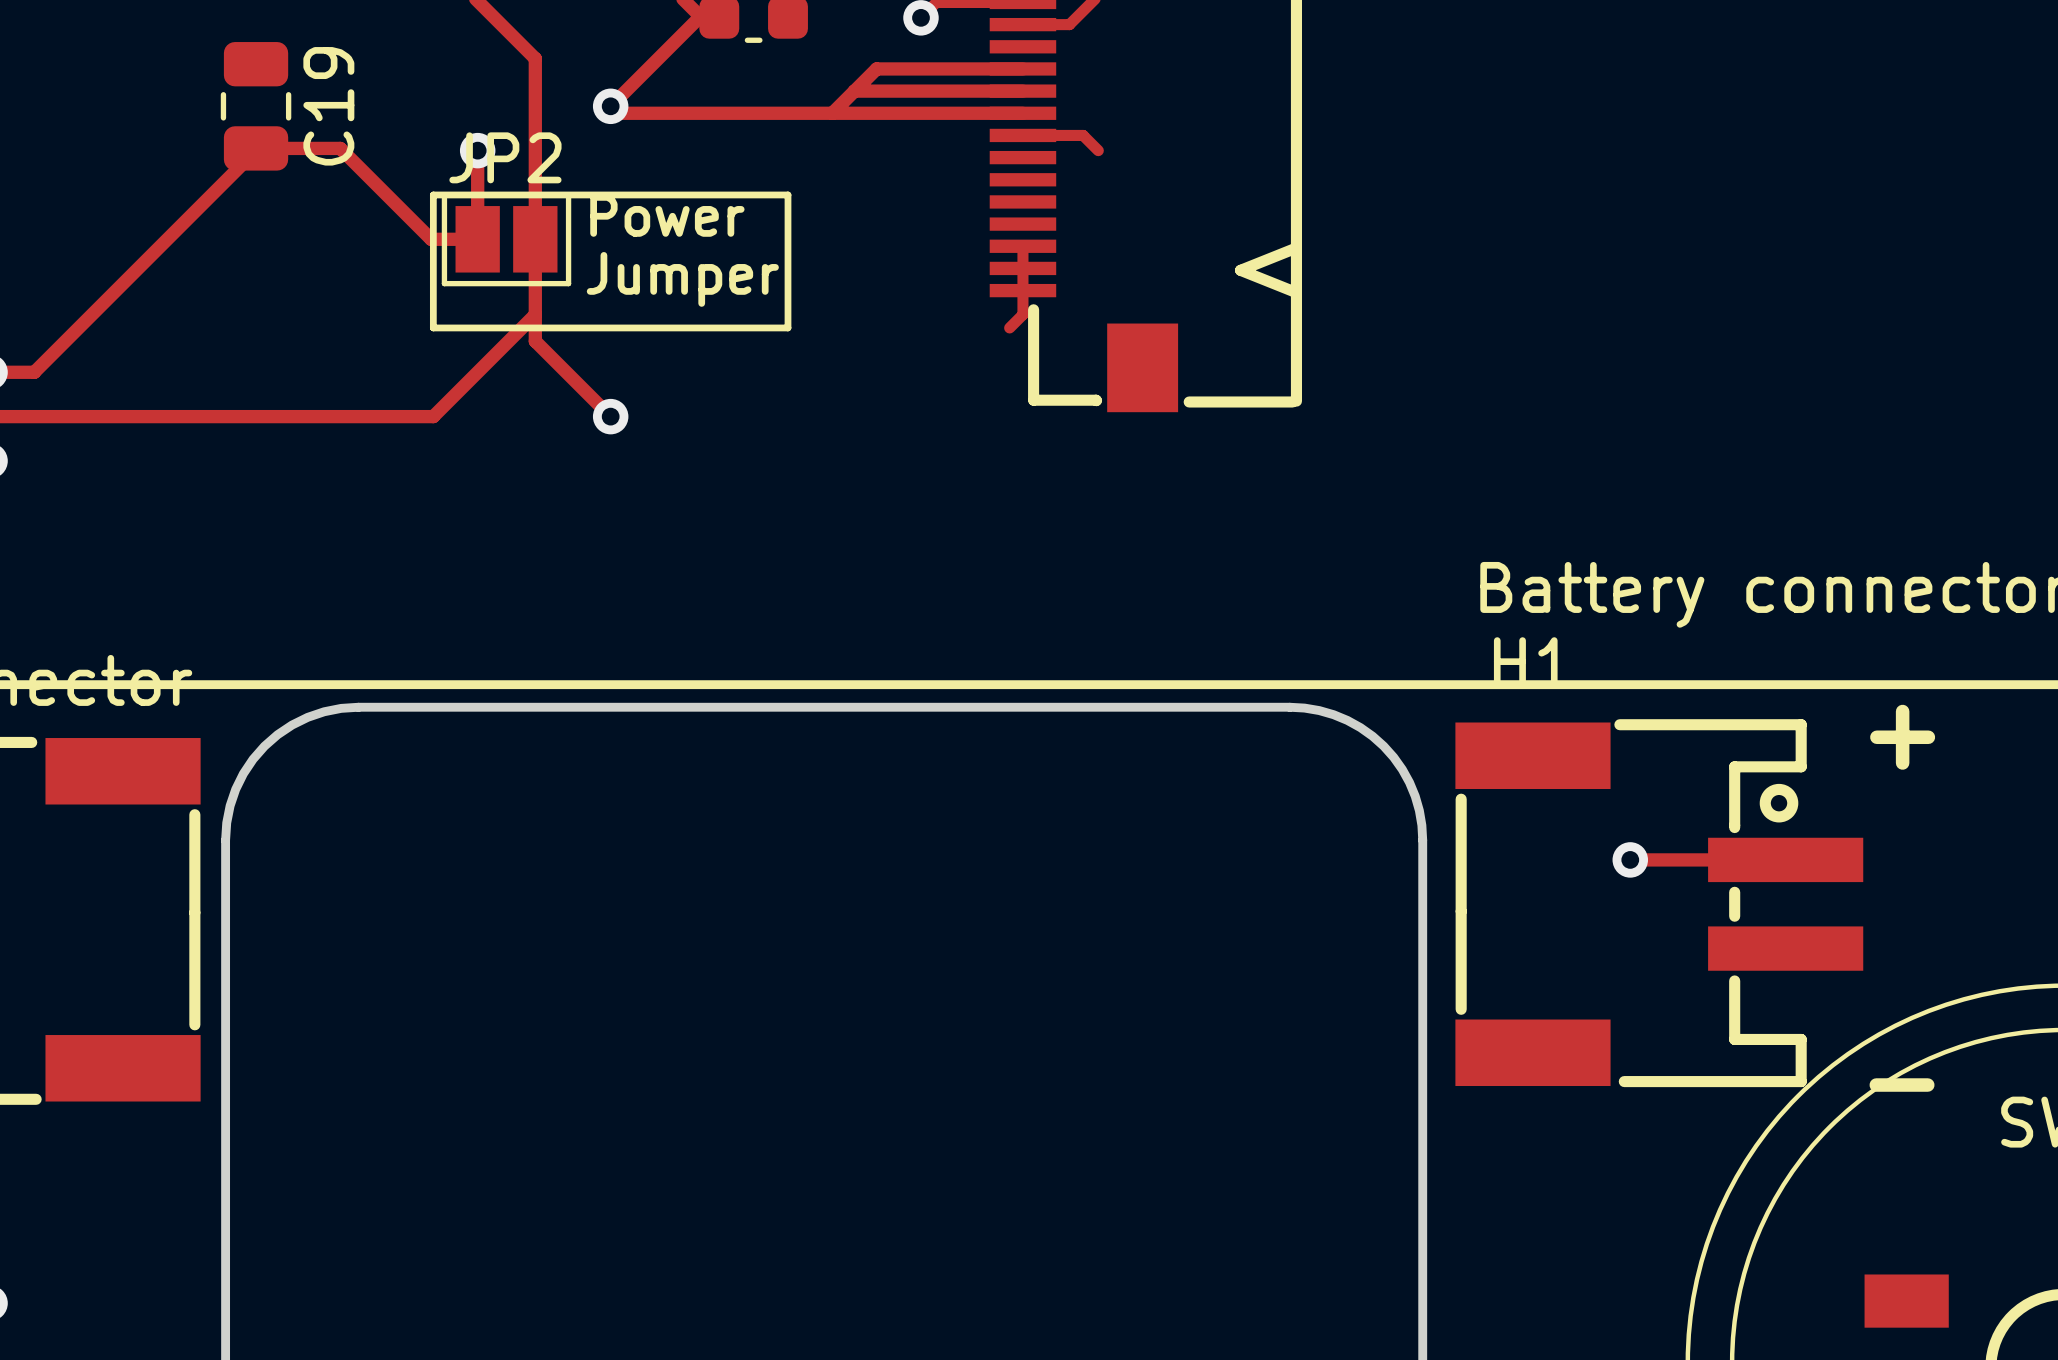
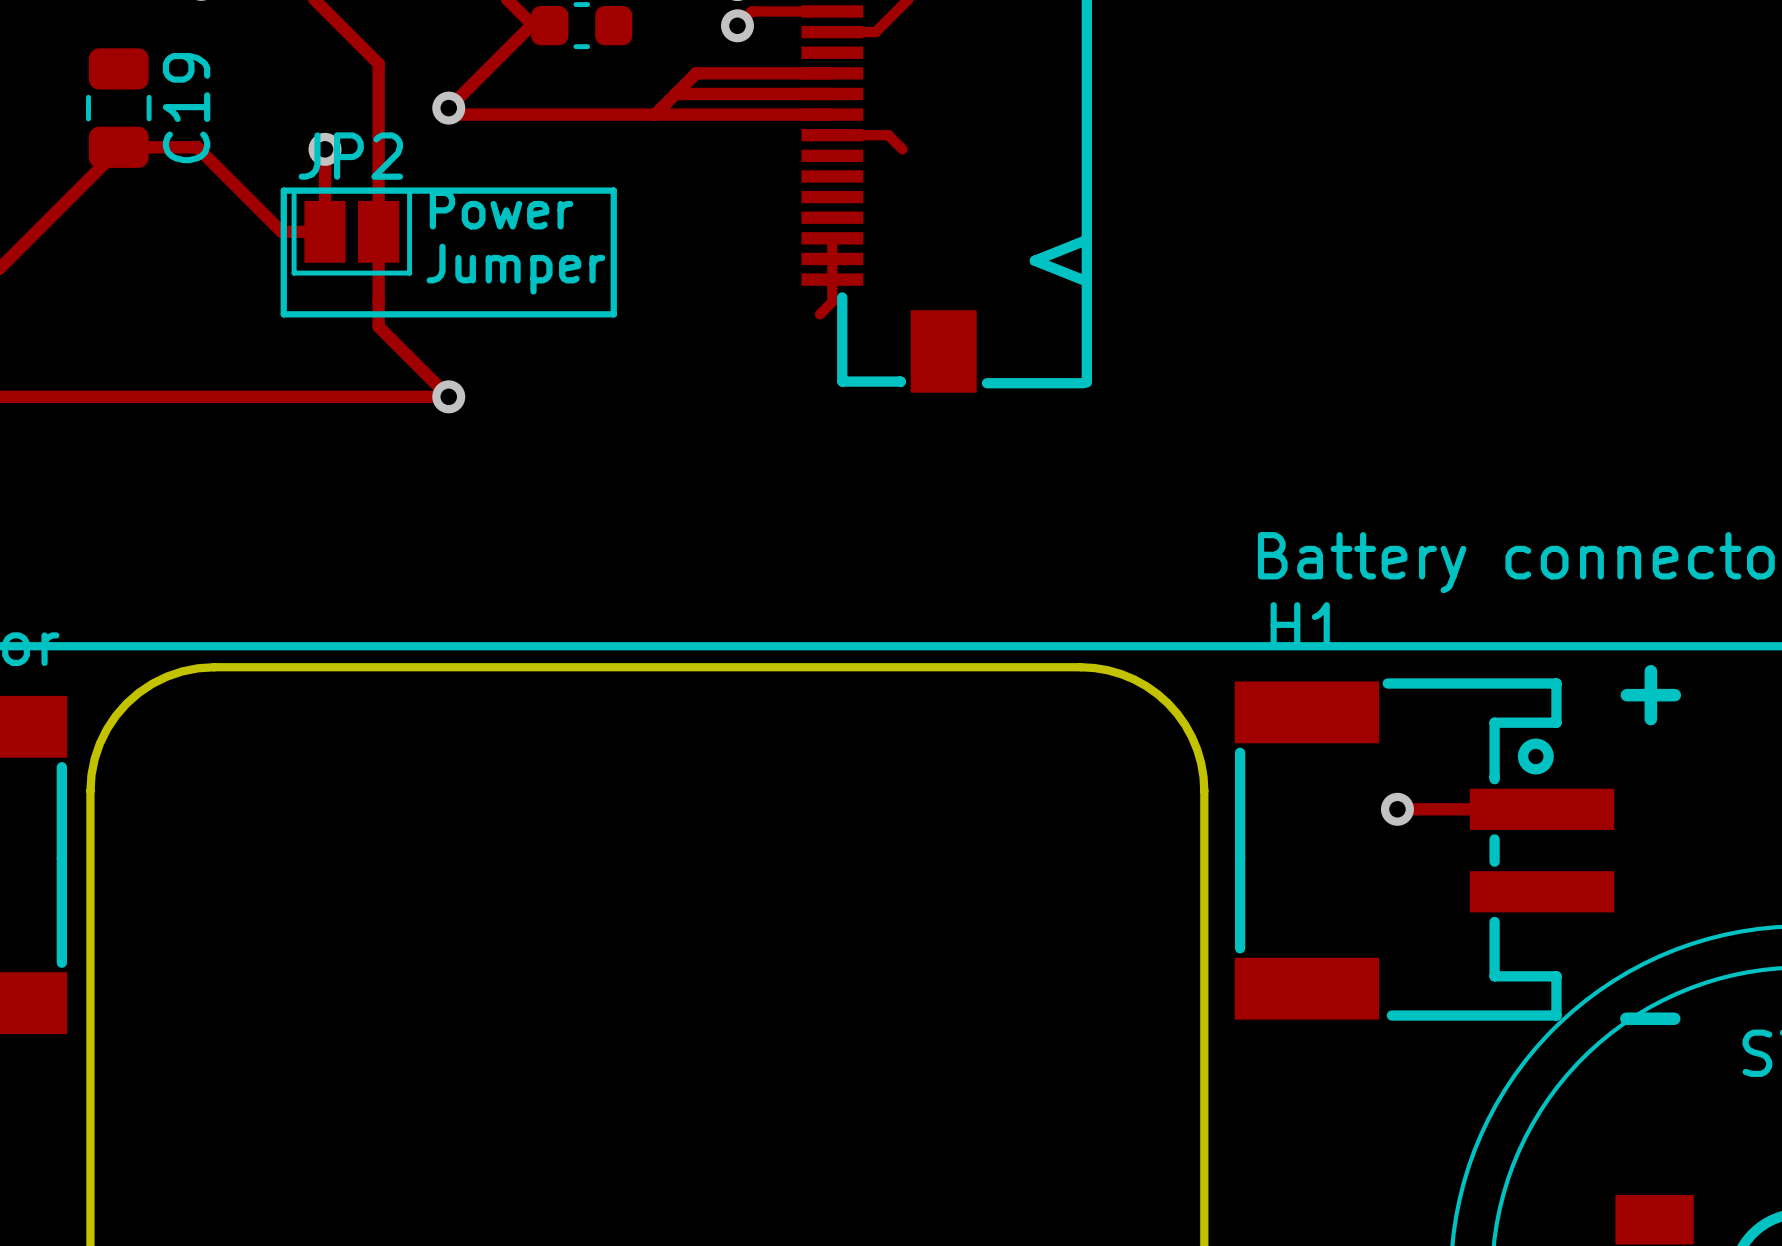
track: (535, 314) (433, 416) -> (448, 396) (283, 396)

